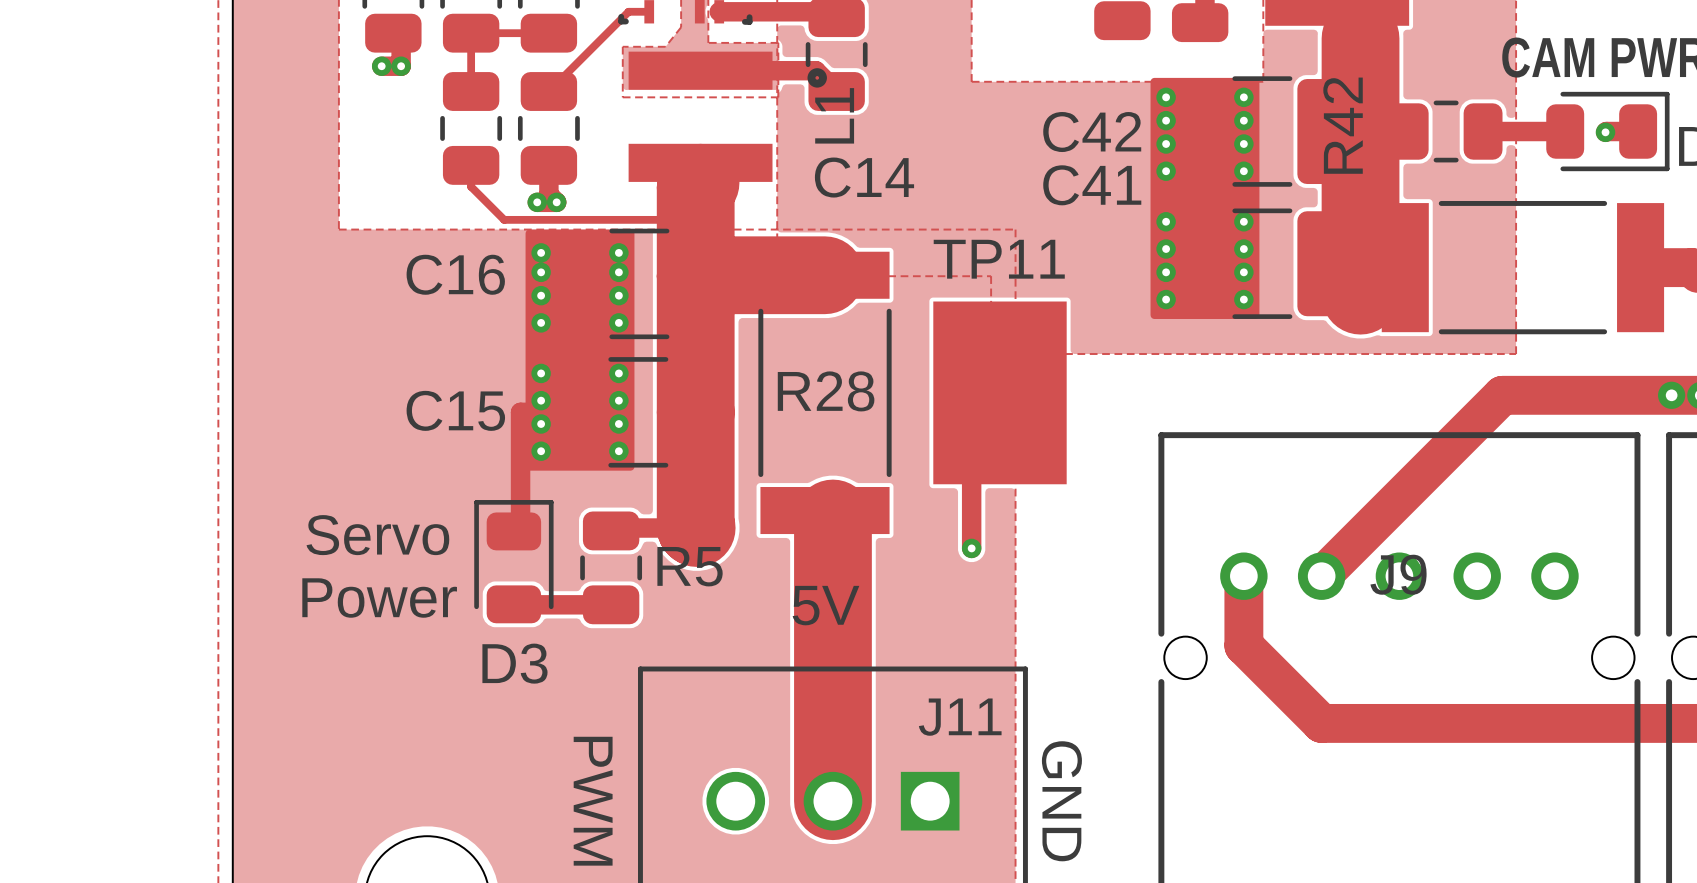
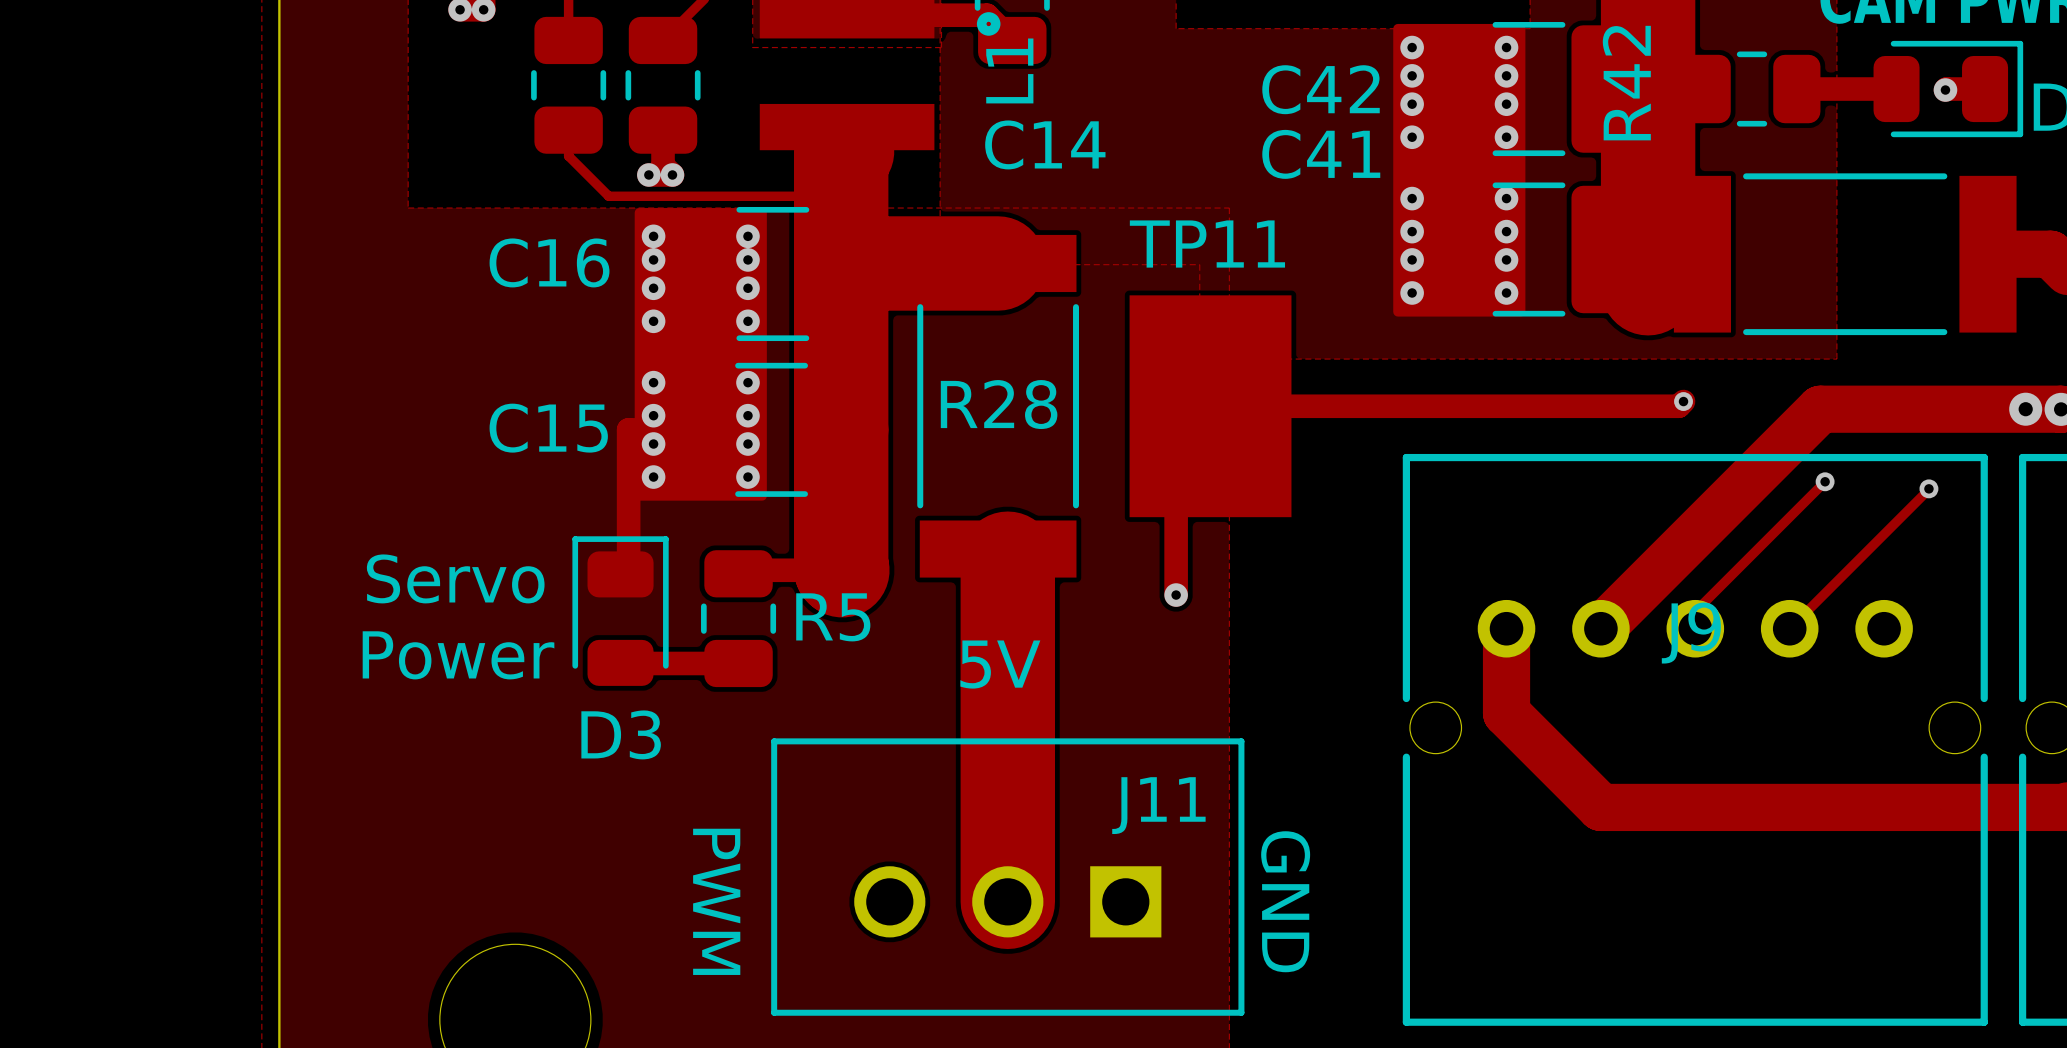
track: none -> (1683, 401) (1678, 406) (1210, 406)
via: none -> (1683, 401)
track: none -> (1825, 481) (1695, 611) (1695, 628)
via: none -> (1825, 481)
via: none -> (1928, 488)
track: none -> (1928, 489) (1789, 628)

